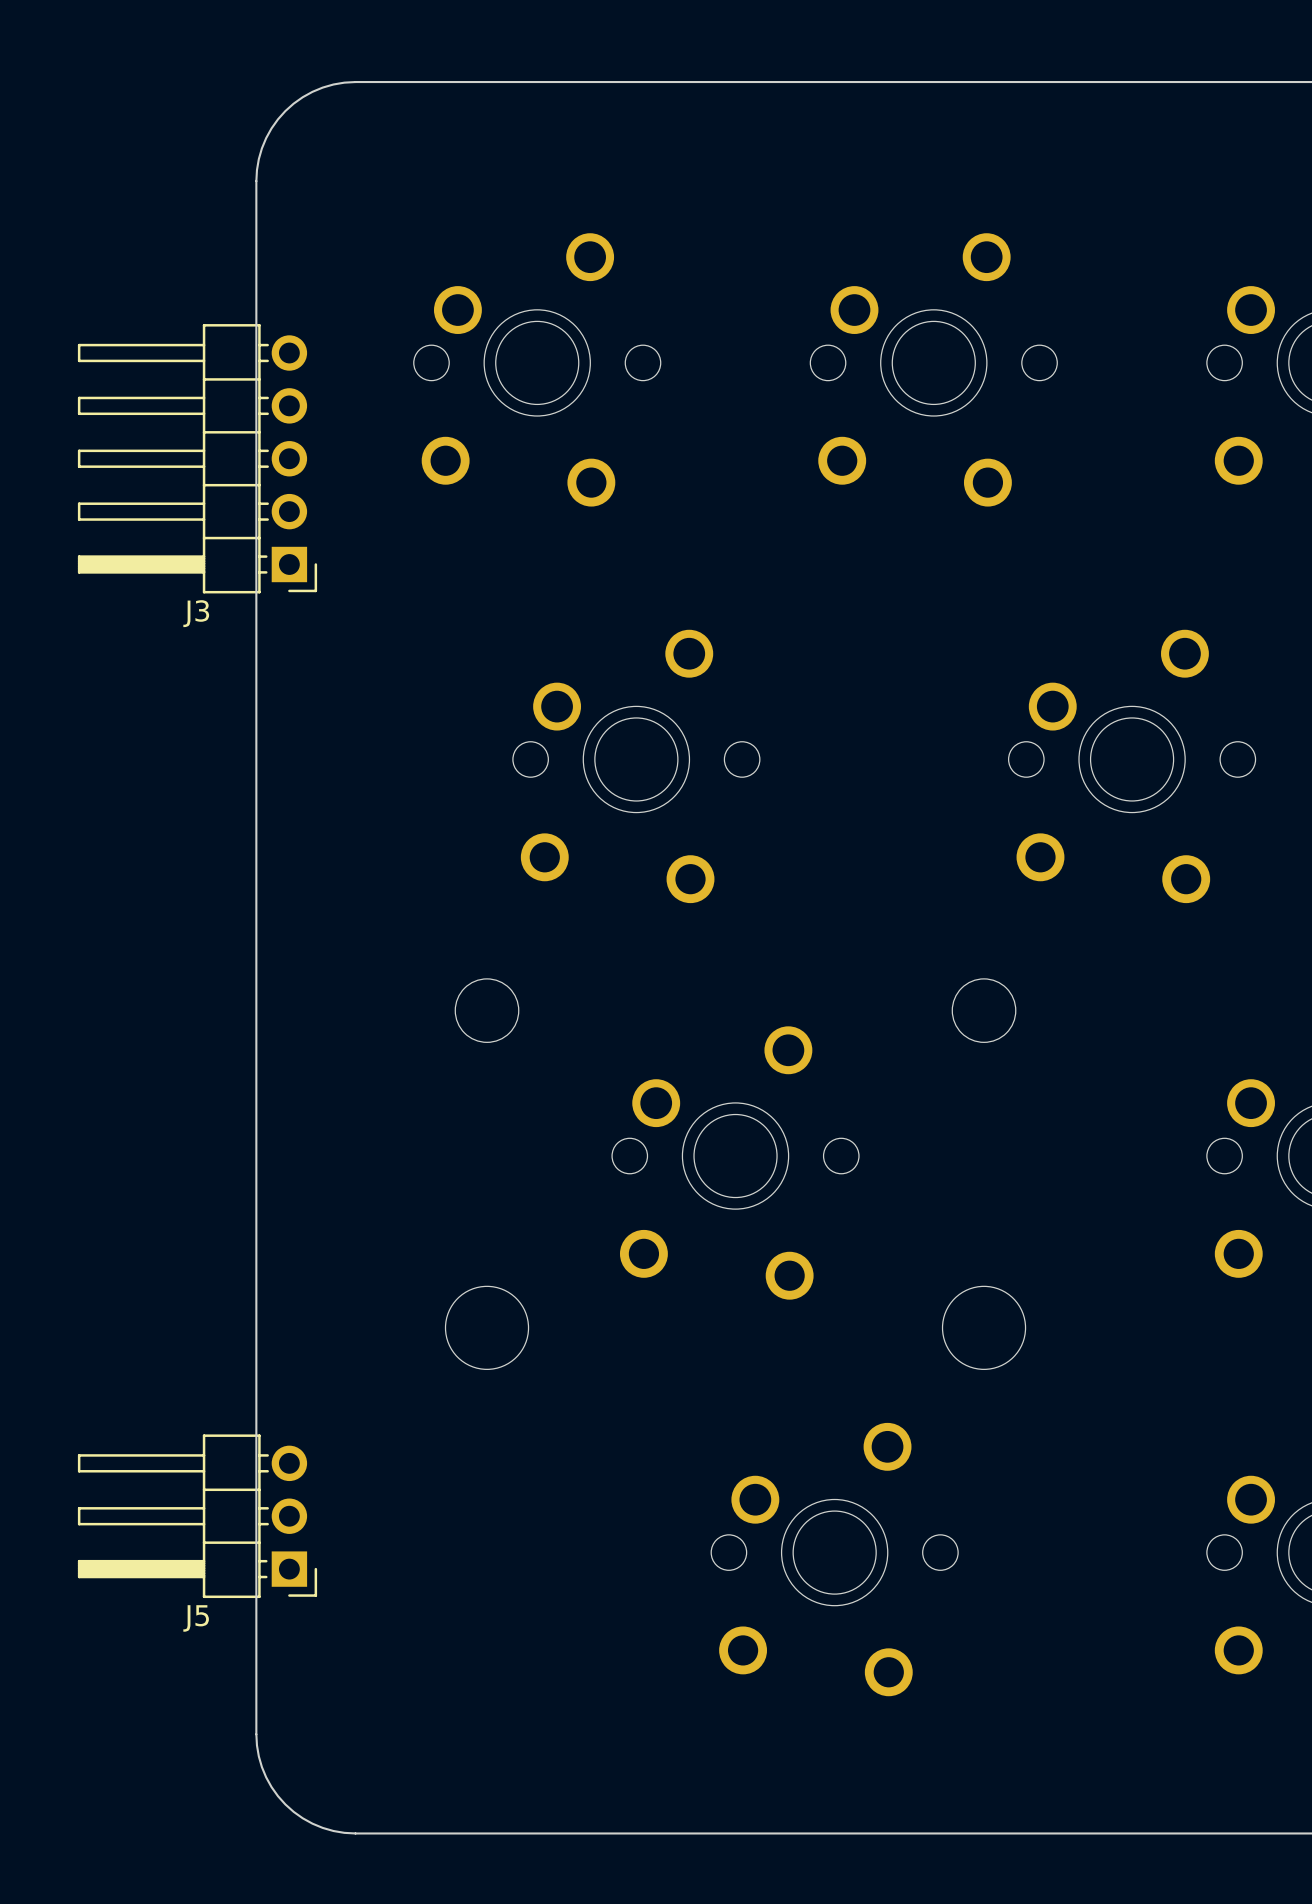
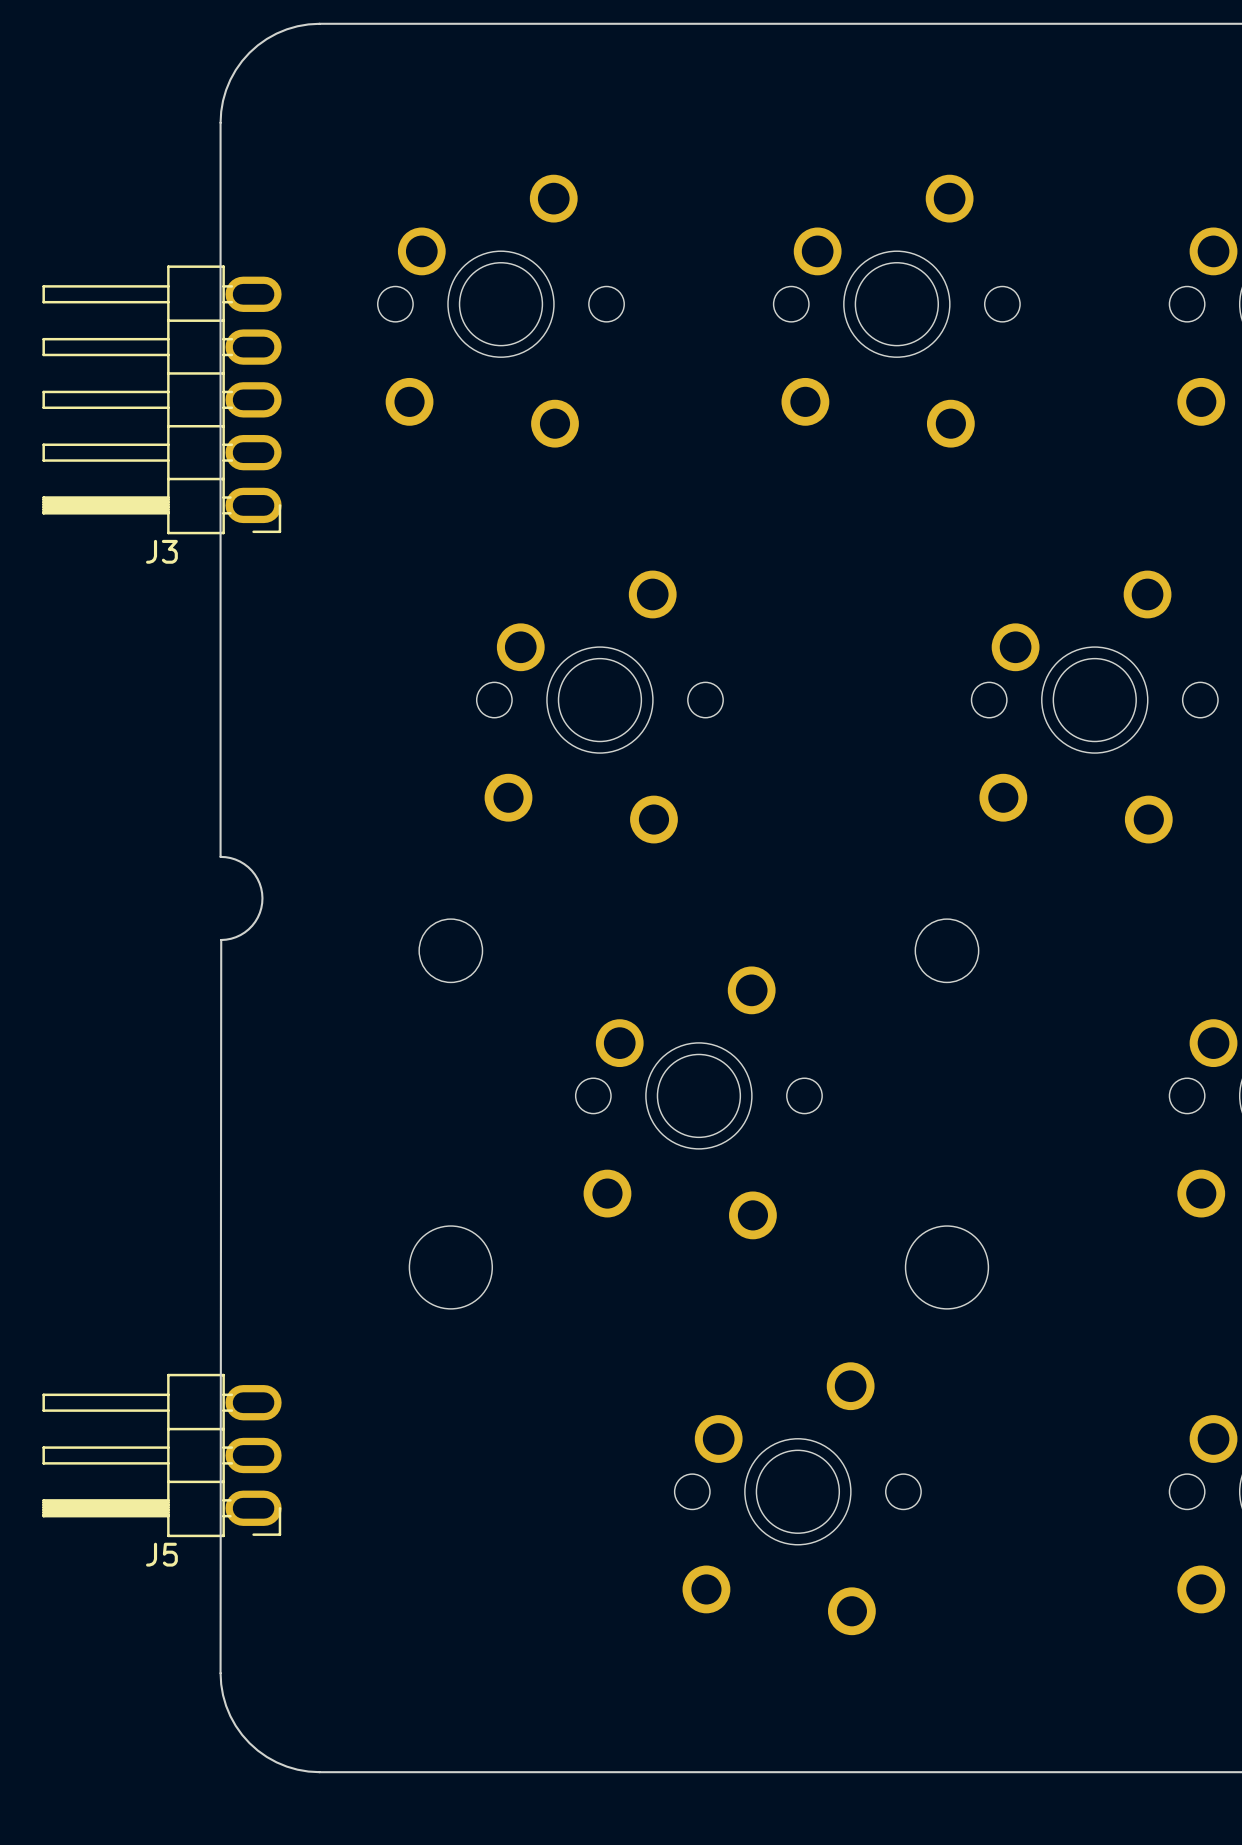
J3 footprint: [77, 324, 318, 594] -> [42, 265, 282, 535]
board edge: (256, 916) (256, 1734) -> (220, 856) (239, 861) (251, 870) (259, 883) (262, 898) (257, 917) (248, 929) (235, 937) (221, 940) (220, 1673)
J5 footprint: [77, 1434, 318, 1599] -> [42, 1373, 282, 1538]

